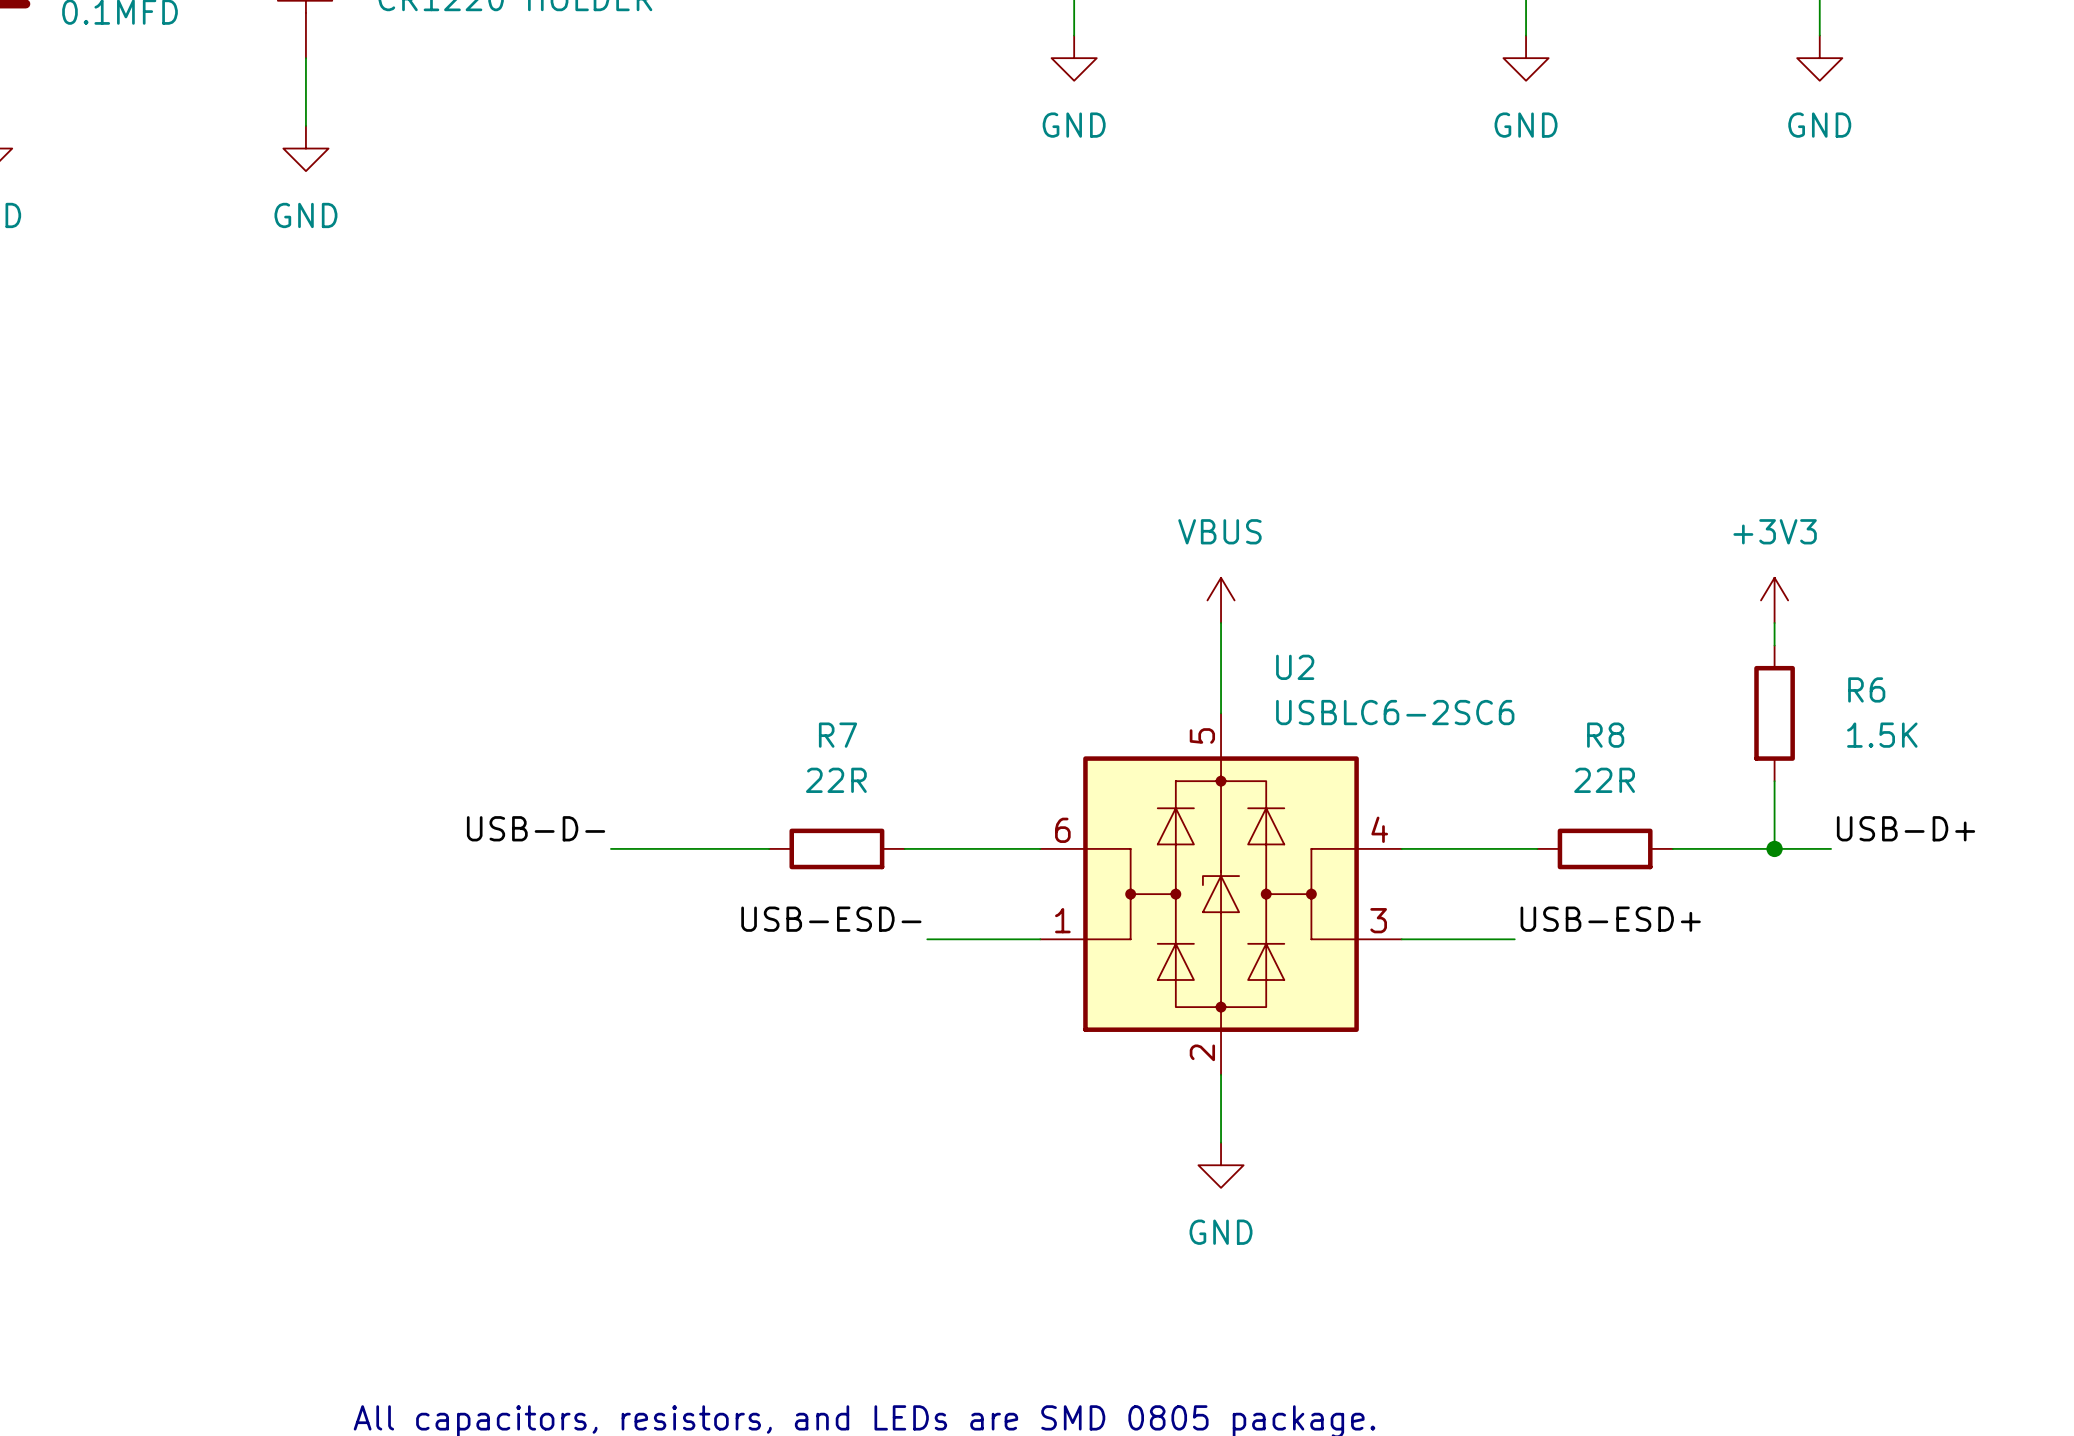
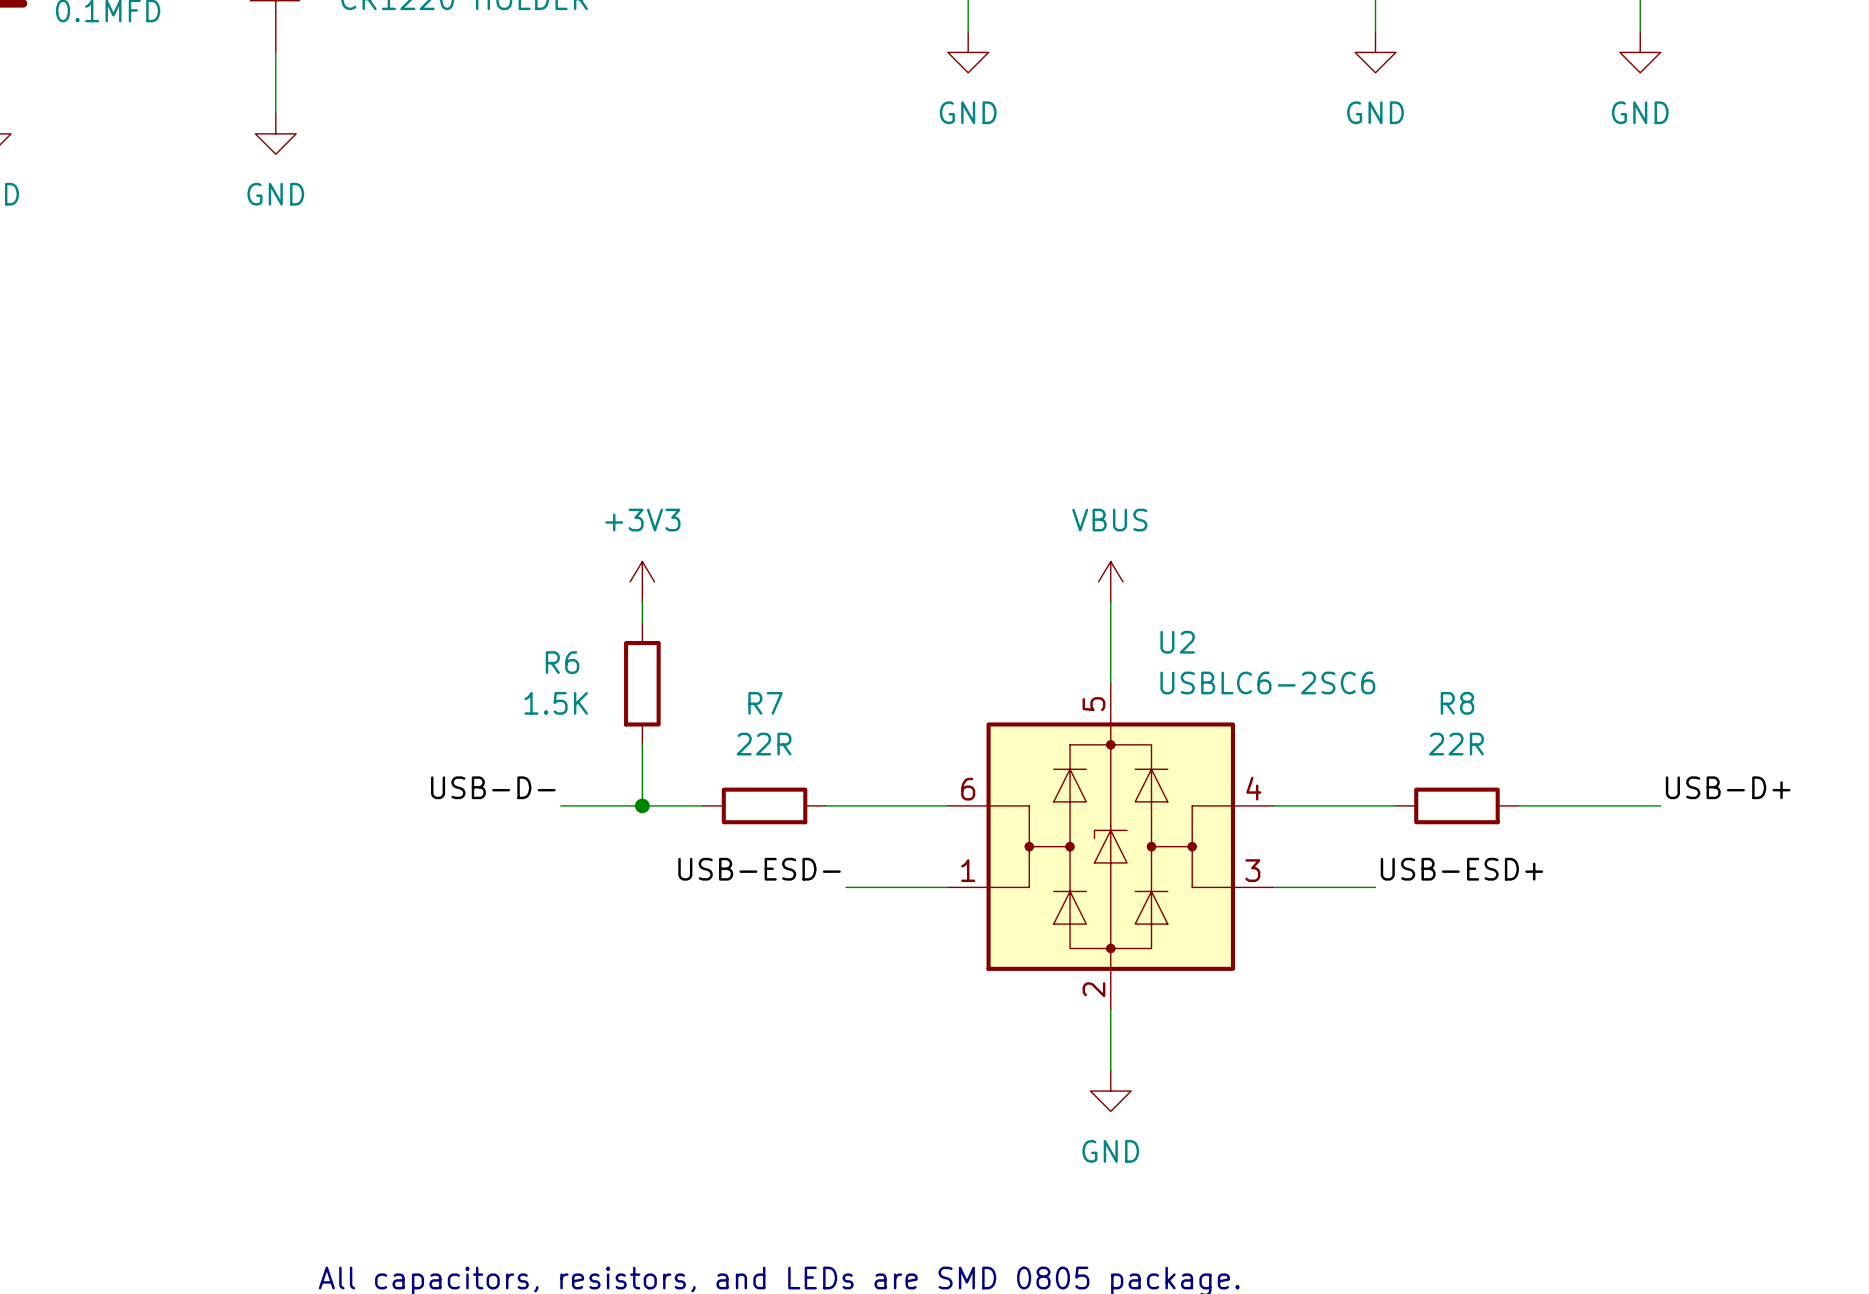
power symbol position: VBUS (1221, 600) -> VBUS (1110, 581)
power symbol: +3V3 (1774, 600) -> none
wire: (1221, 623) (1221, 713) -> (1110, 602) (1110, 683)
wire: (1774, 623) (1774, 645) -> none
power symbol: none -> +3V3 (642, 581)
wire: none -> (642, 602) (642, 622)
R6 name position: R6 (1866, 689) -> R6 (562, 662)
R6 position: (1774, 713) -> (642, 683)
R6 value position: 1.5K (1882, 735) -> 1.5K (556, 703)
wire: (1774, 781) (1774, 848) -> none
wire: none -> (642, 744) (642, 805)
label position: USB-D- (536, 828) -> USB-D- (493, 787)
label position: USB-D+ (1906, 828) -> USB-D+ (1728, 787)
wire: (610, 848) (769, 848) -> (560, 805) (703, 805)
R7 position: (836, 848) -> (764, 805)
wire: (904, 848) (1040, 848) -> (825, 805) (947, 805)
wire: (1401, 848) (1537, 848) -> (1273, 805) (1395, 805)
R8 position: (1605, 848) -> (1456, 805)
wire: (1672, 848) (1831, 848) -> (1518, 805) (1660, 805)
junction: (1774, 848) -> none
junction: none -> (642, 805)
U2 position: (1221, 894) -> (1110, 846)
label position: USB-ESD- (831, 919) -> USB-ESD- (759, 869)
label position: USB-ESD+ (1610, 919) -> USB-ESD+ (1461, 869)
wire: (927, 939) (1040, 939) -> (846, 887) (947, 887)
wire: (1401, 939) (1514, 939) -> (1273, 887) (1375, 887)
wire: (1221, 1074) (1221, 1142) -> (1110, 1009) (1110, 1070)
power symbol position: GND (1221, 1165) -> GND (1110, 1091)

